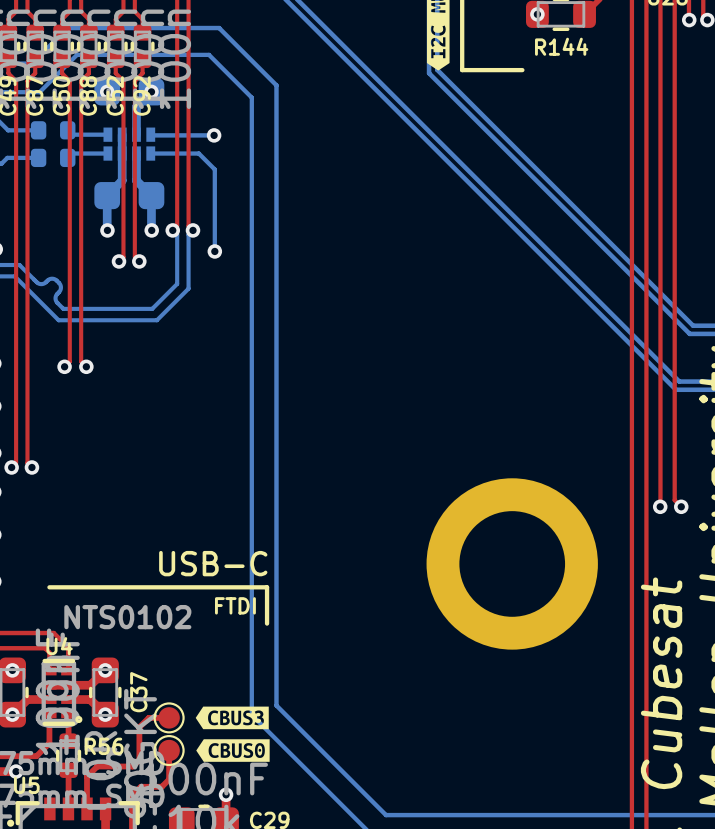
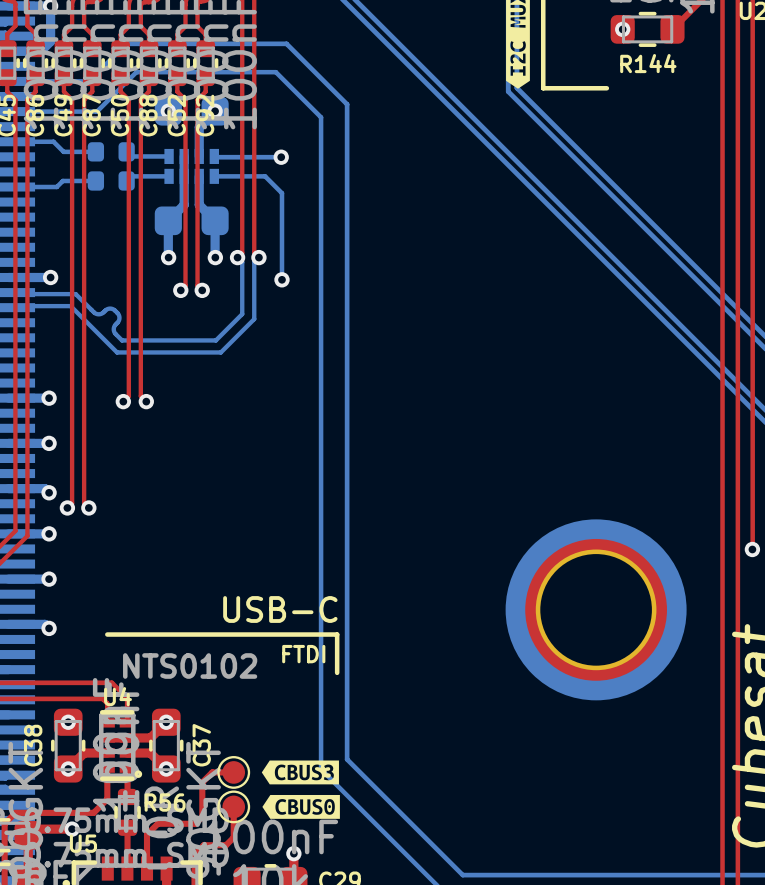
part footprint: [426, 478, 598, 650] -> [505, 519, 687, 701]

